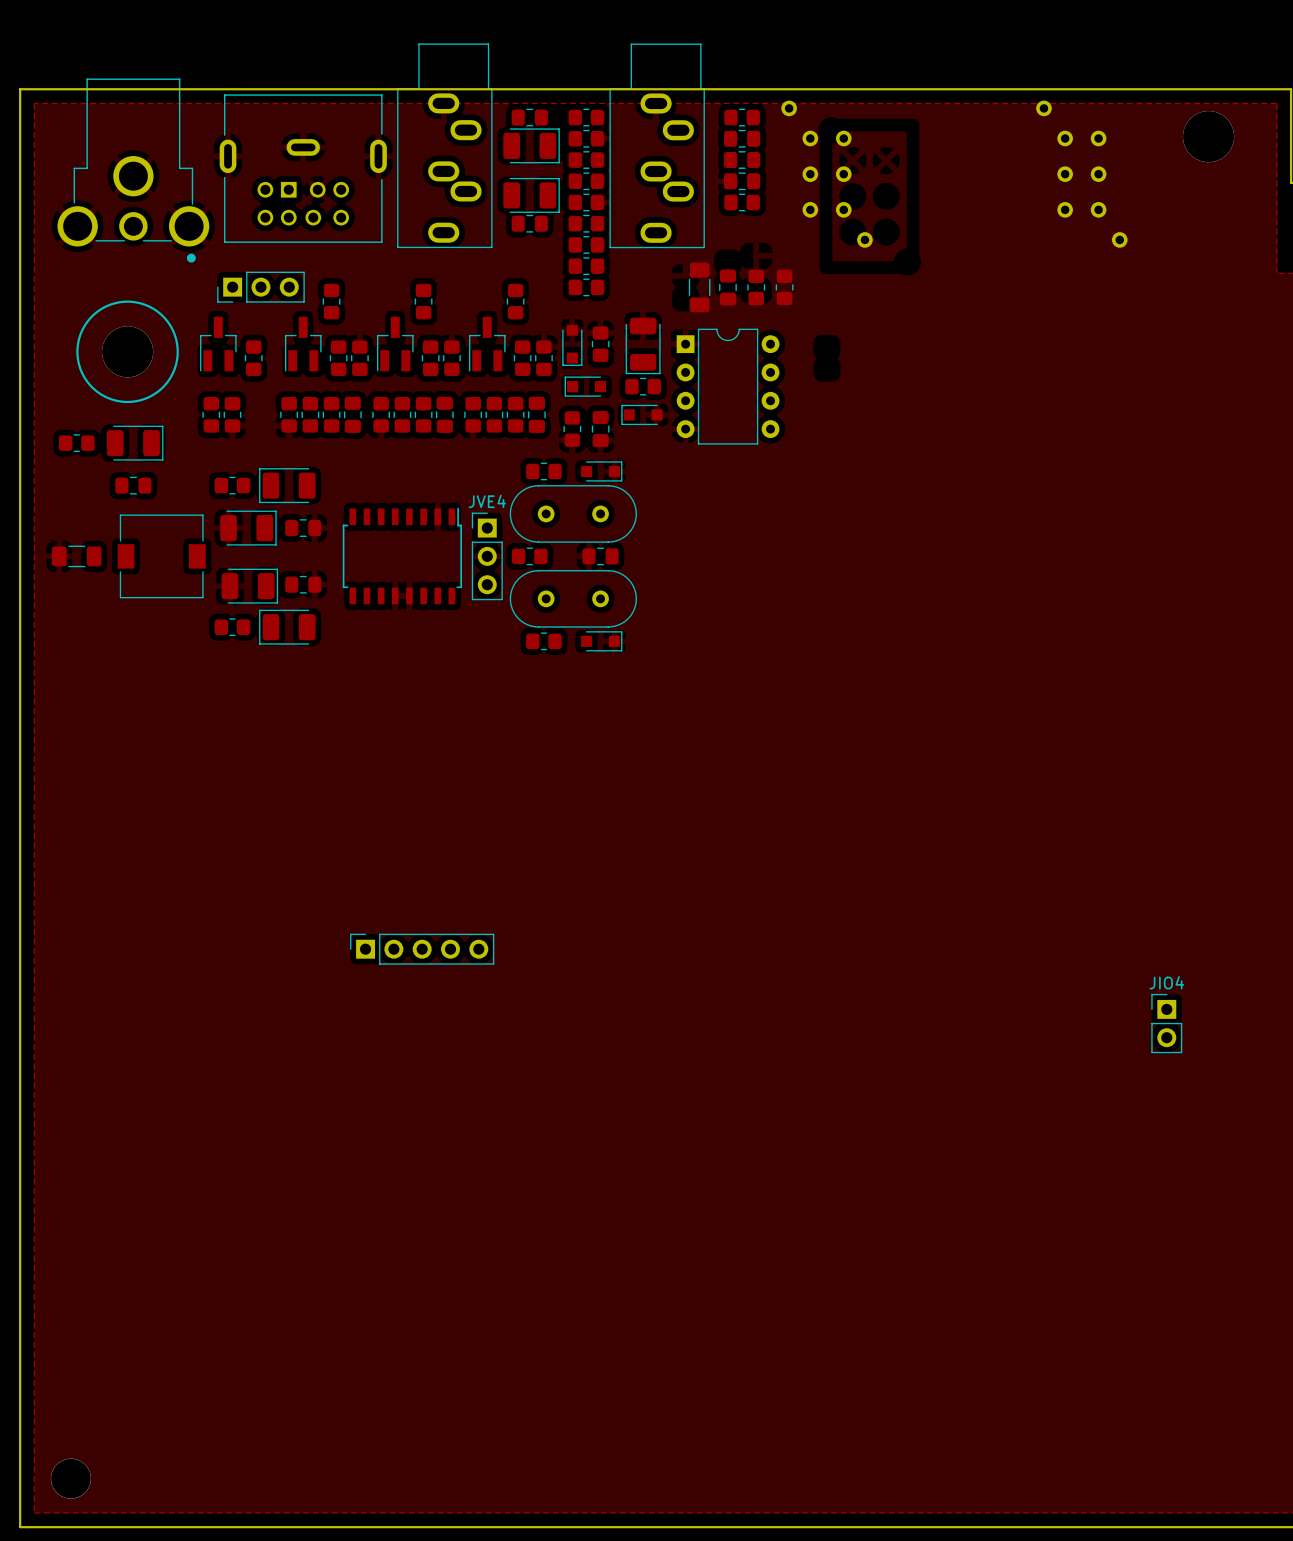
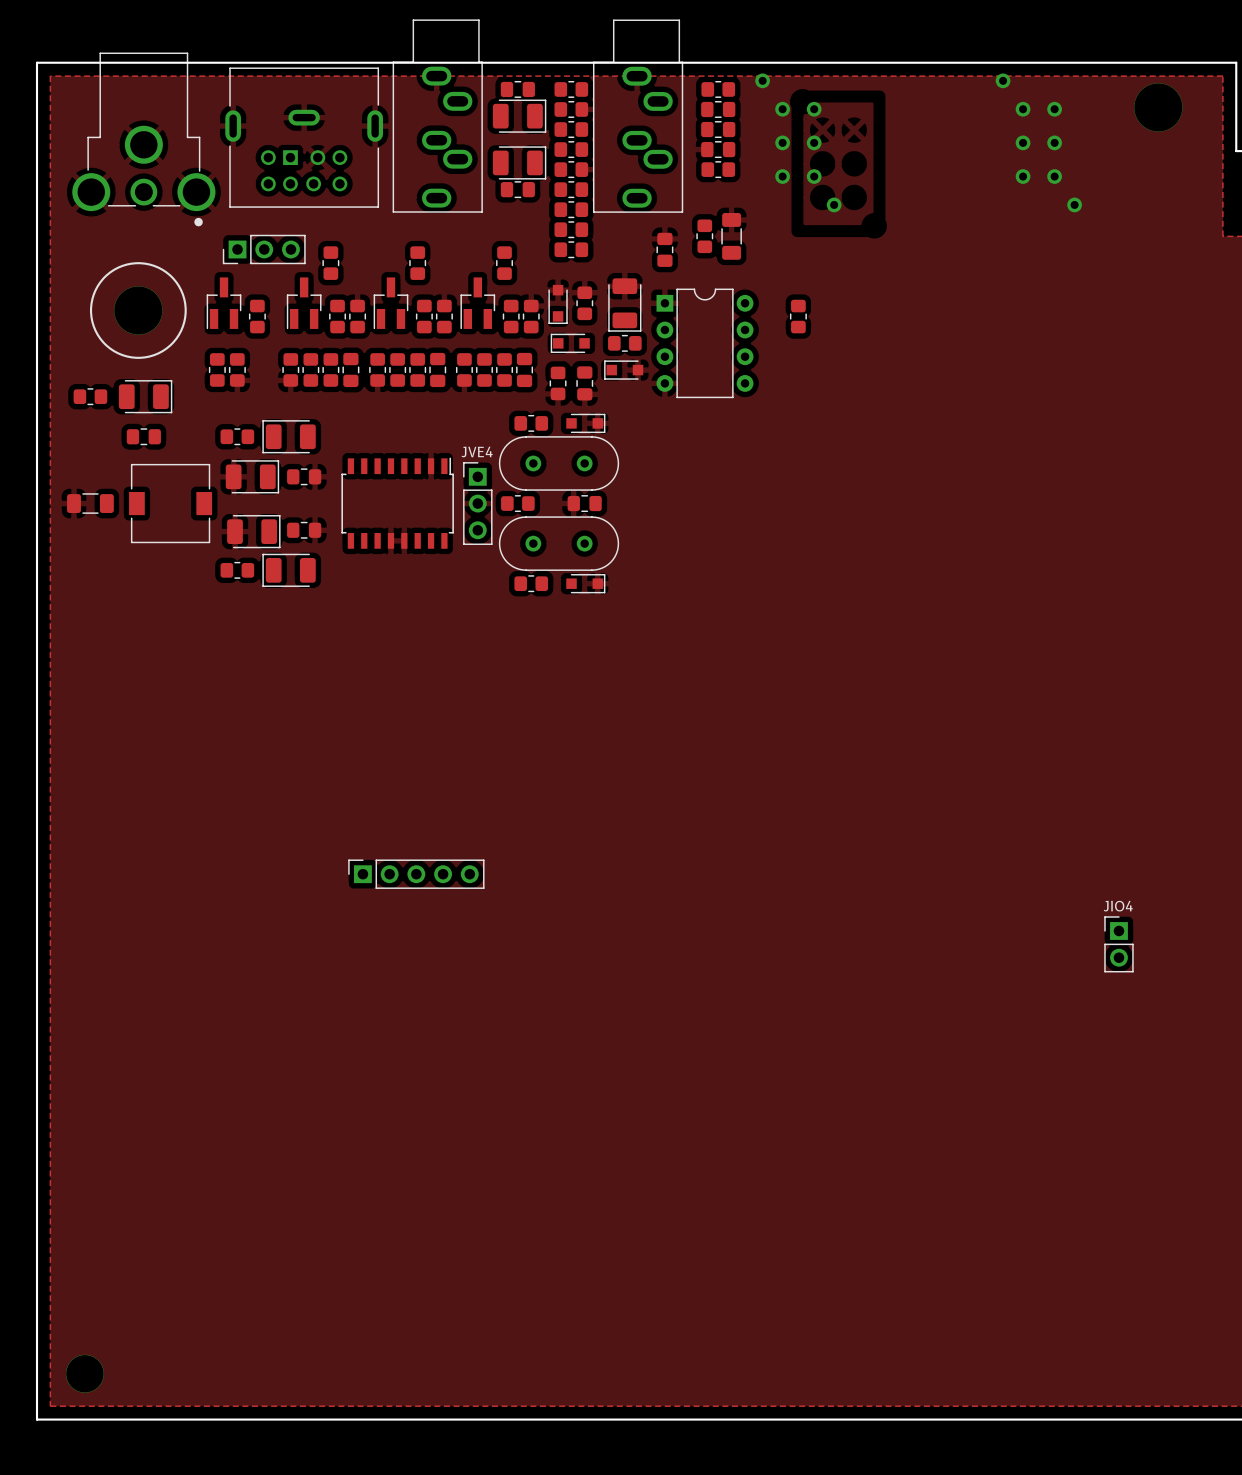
part: none -> (704, 236)
part position: (699, 287) -> (731, 236)
part position: (727, 287) -> (664, 249)
part: (756, 287) -> none
part: (784, 287) -> none
part: none -> (798, 316)

